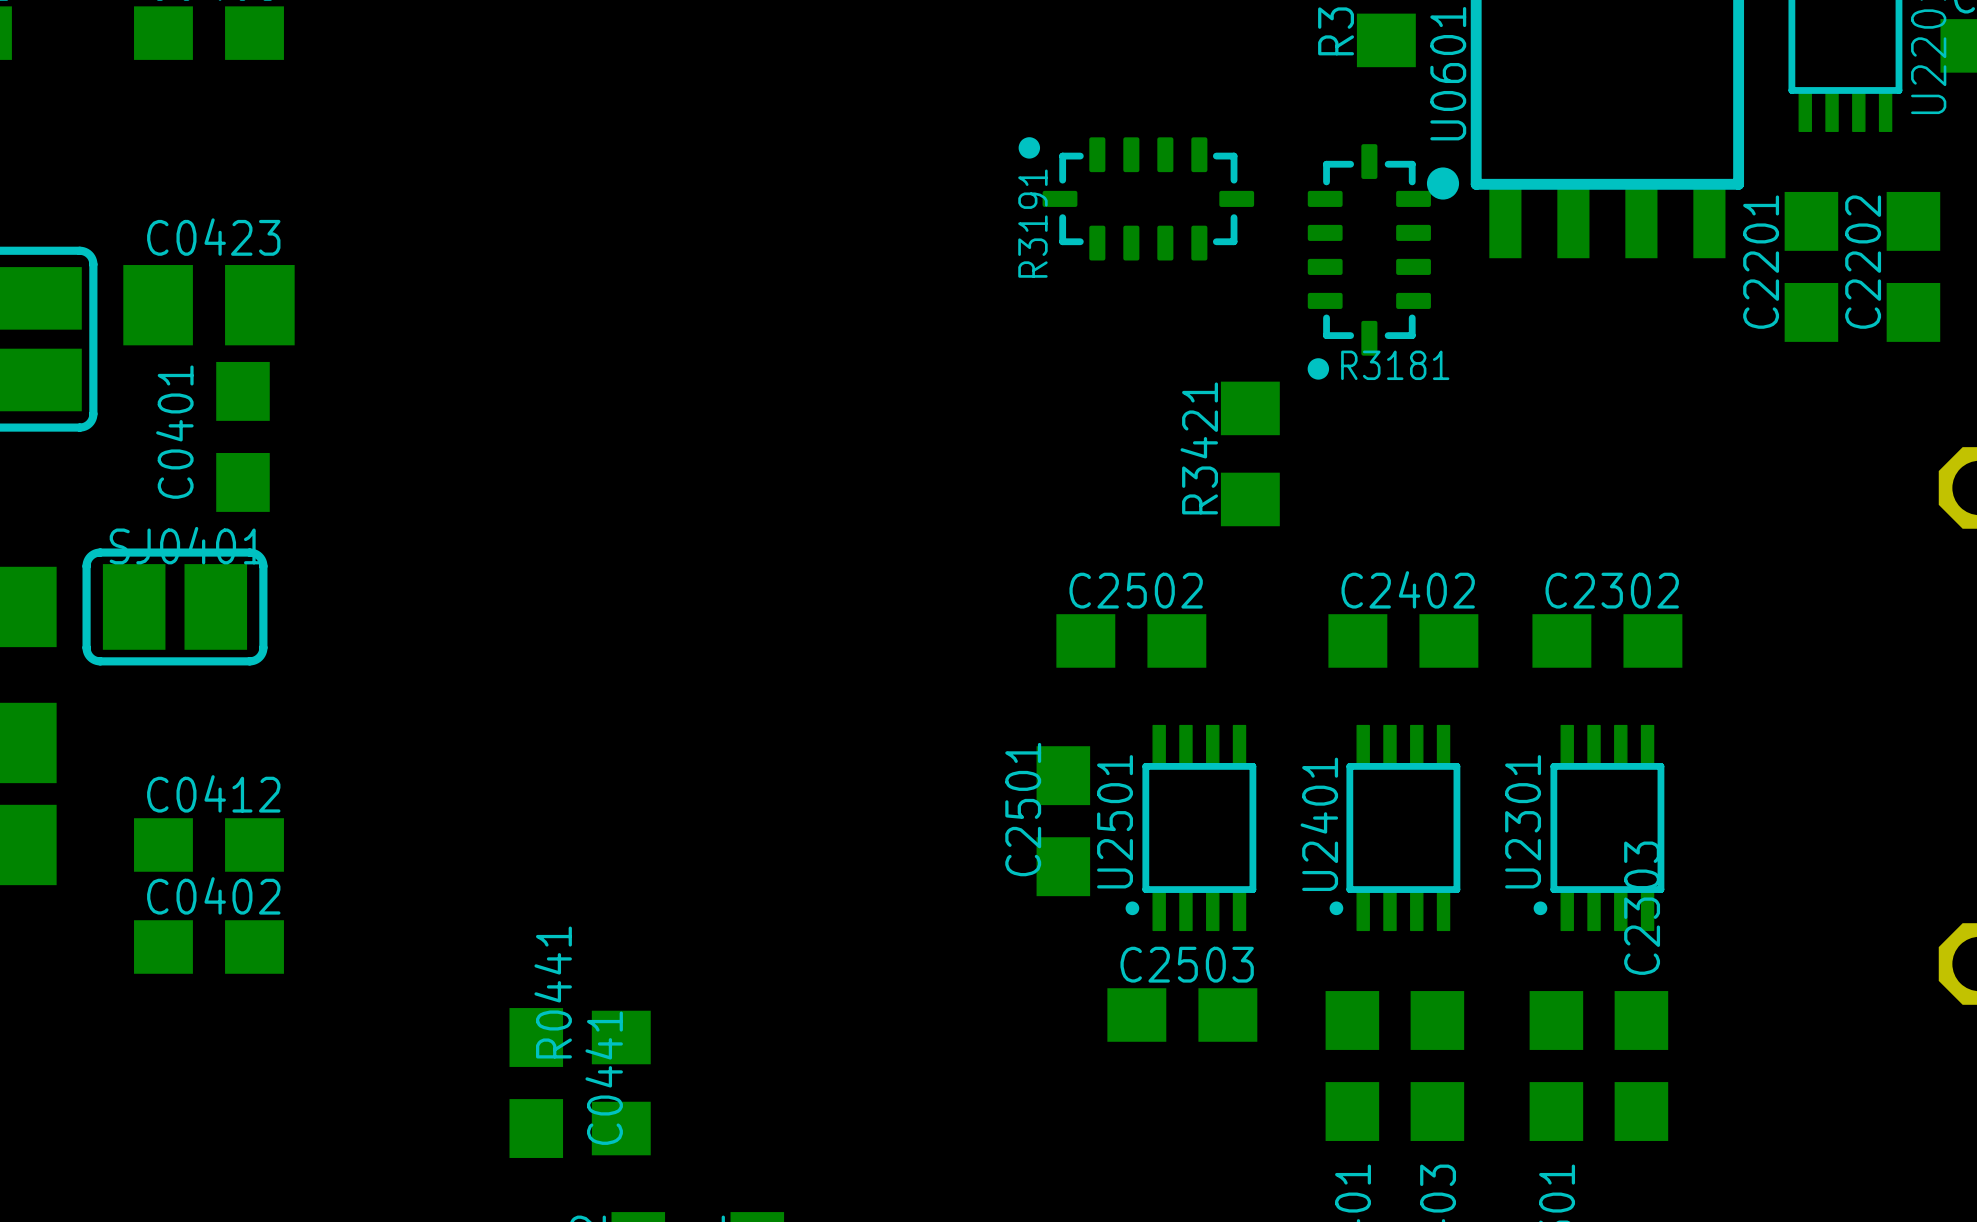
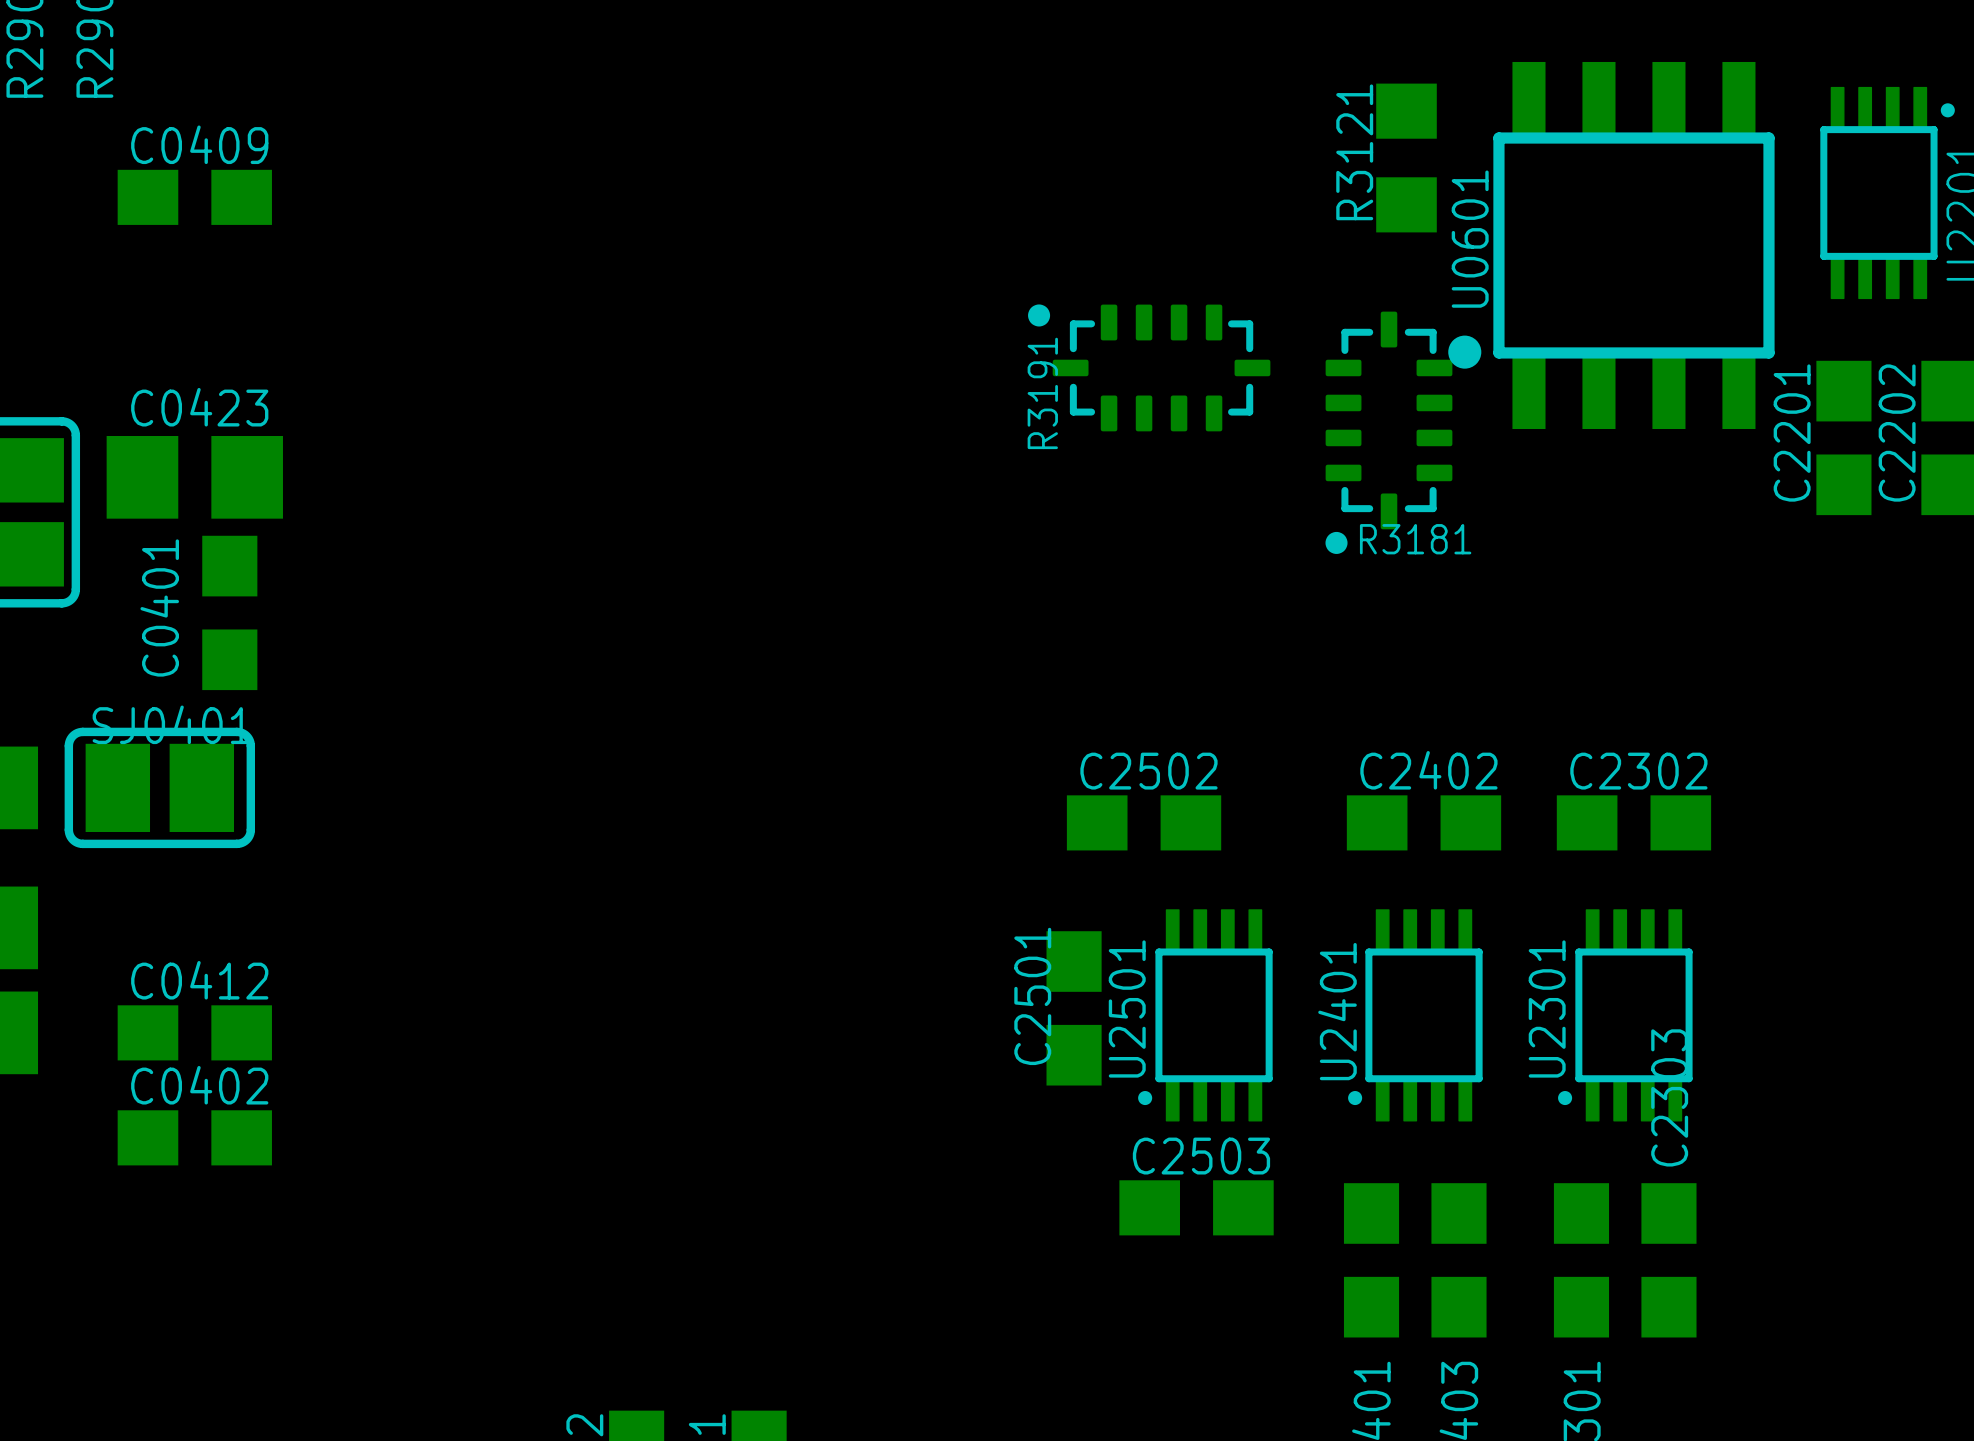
R3421: (1250, 453) -> none
C0441: (536, 1083) -> none
R0441: (621, 1083) -> none

